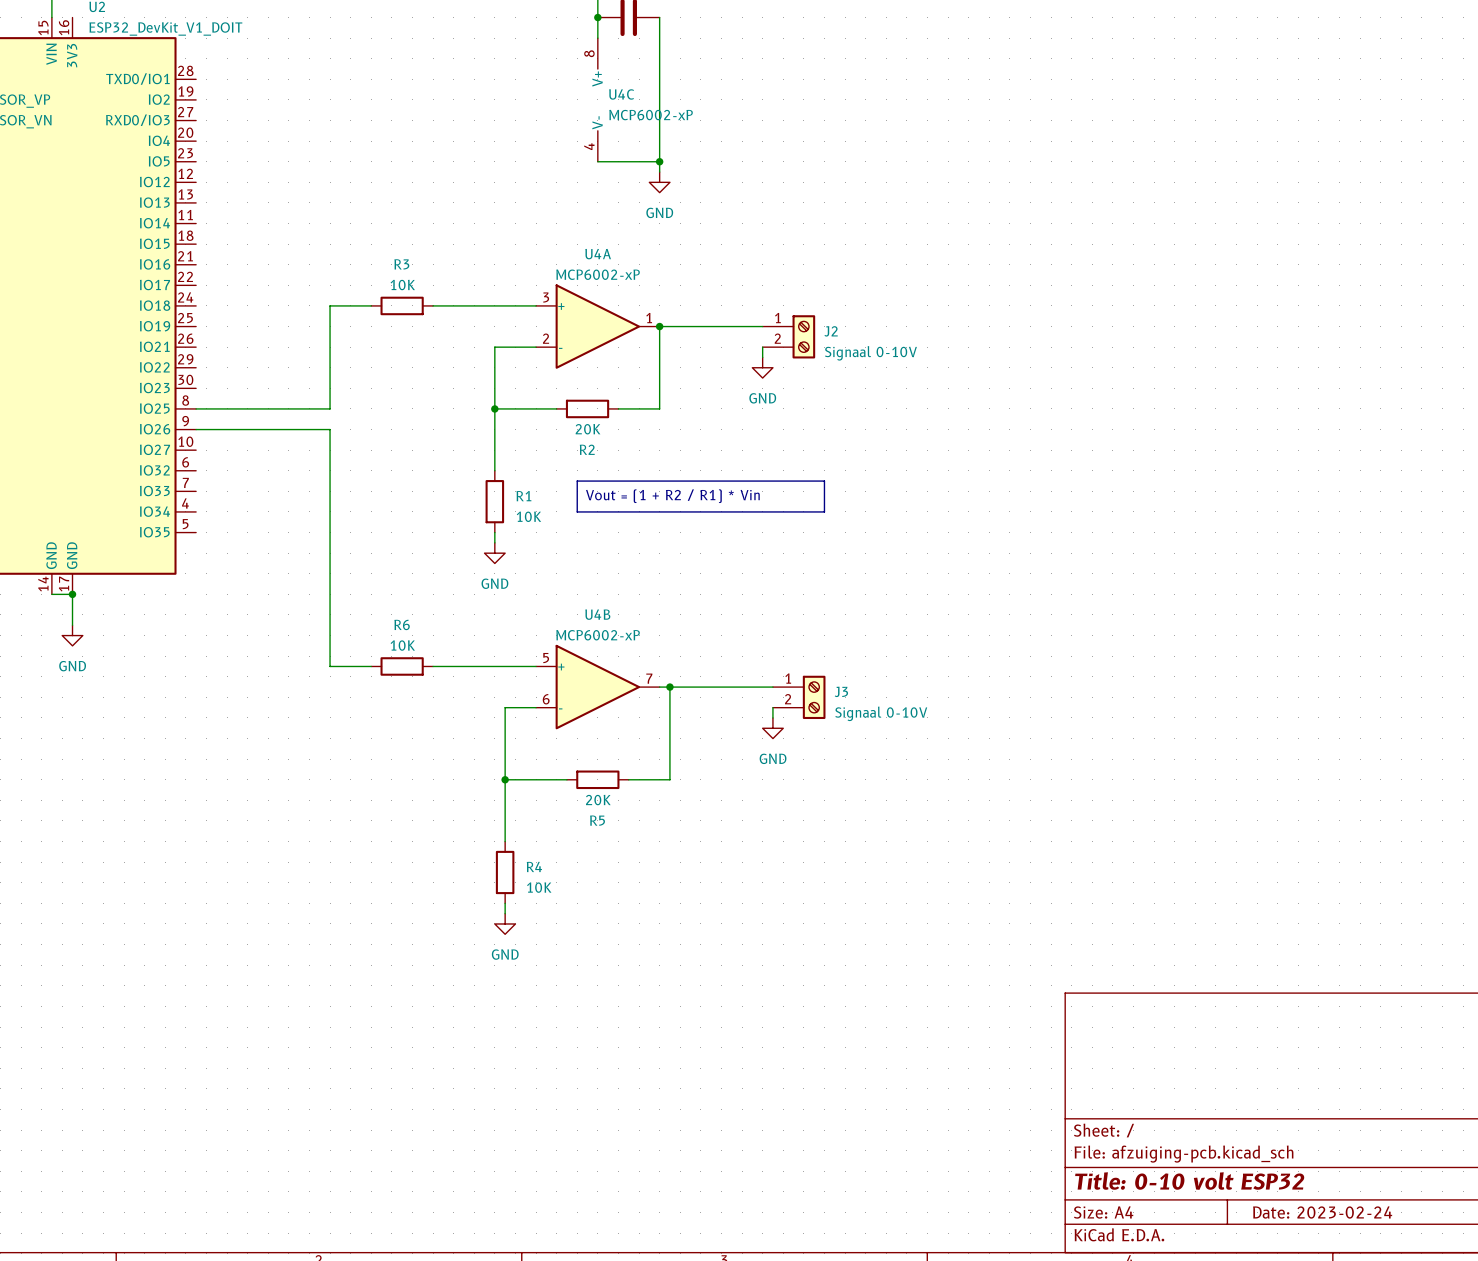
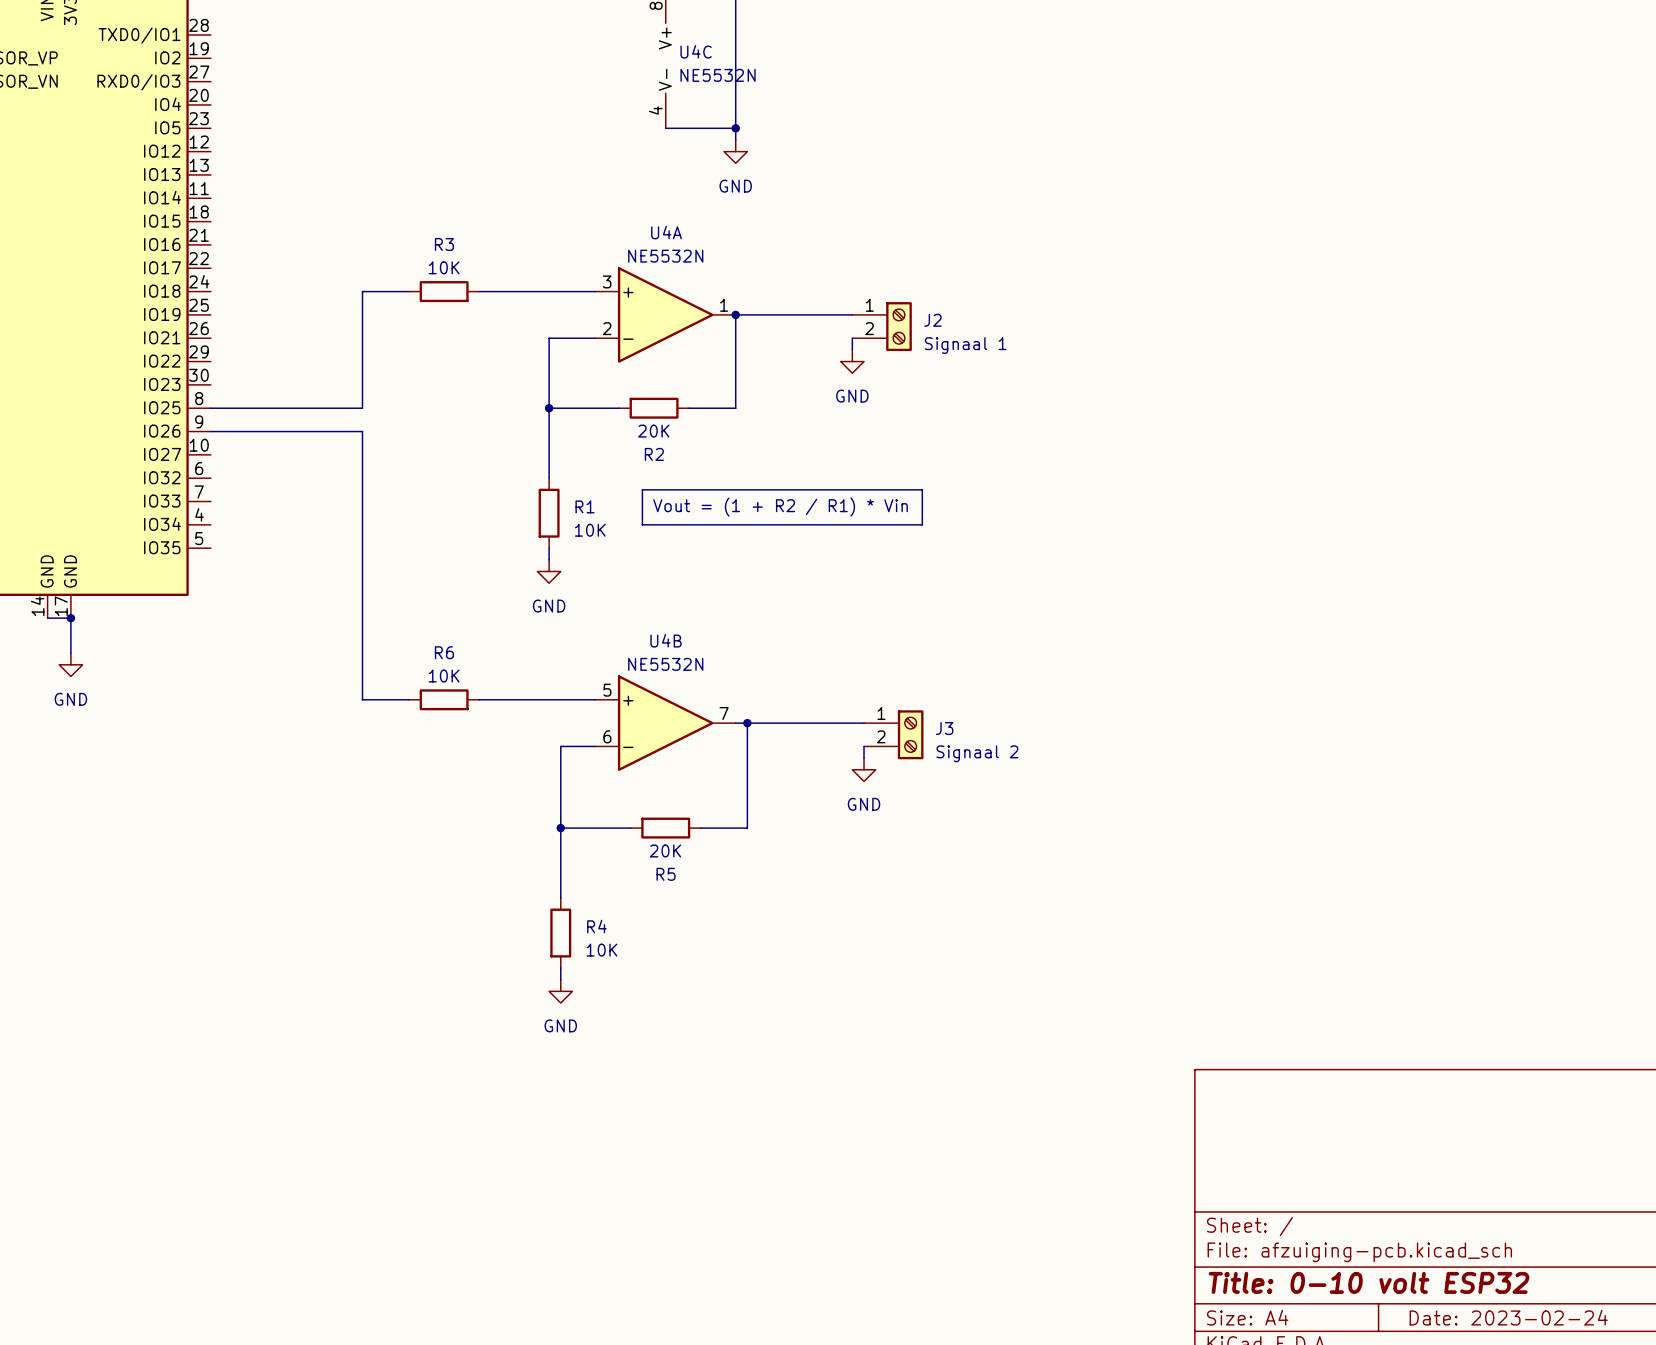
U4C value: MCP6002-xP (651, 115) -> NE5532N (718, 75)
U4A value: MCP6002-xP (598, 274) -> NE5532N (665, 256)
J2 value: Signaal 0-10V (870, 353) -> Signaal 1 (965, 345)
U4B value: MCP6002-xP (598, 635) -> NE5532N (665, 664)
J3 value: Signaal 0-10V (881, 713) -> Signaal 2 (977, 753)

